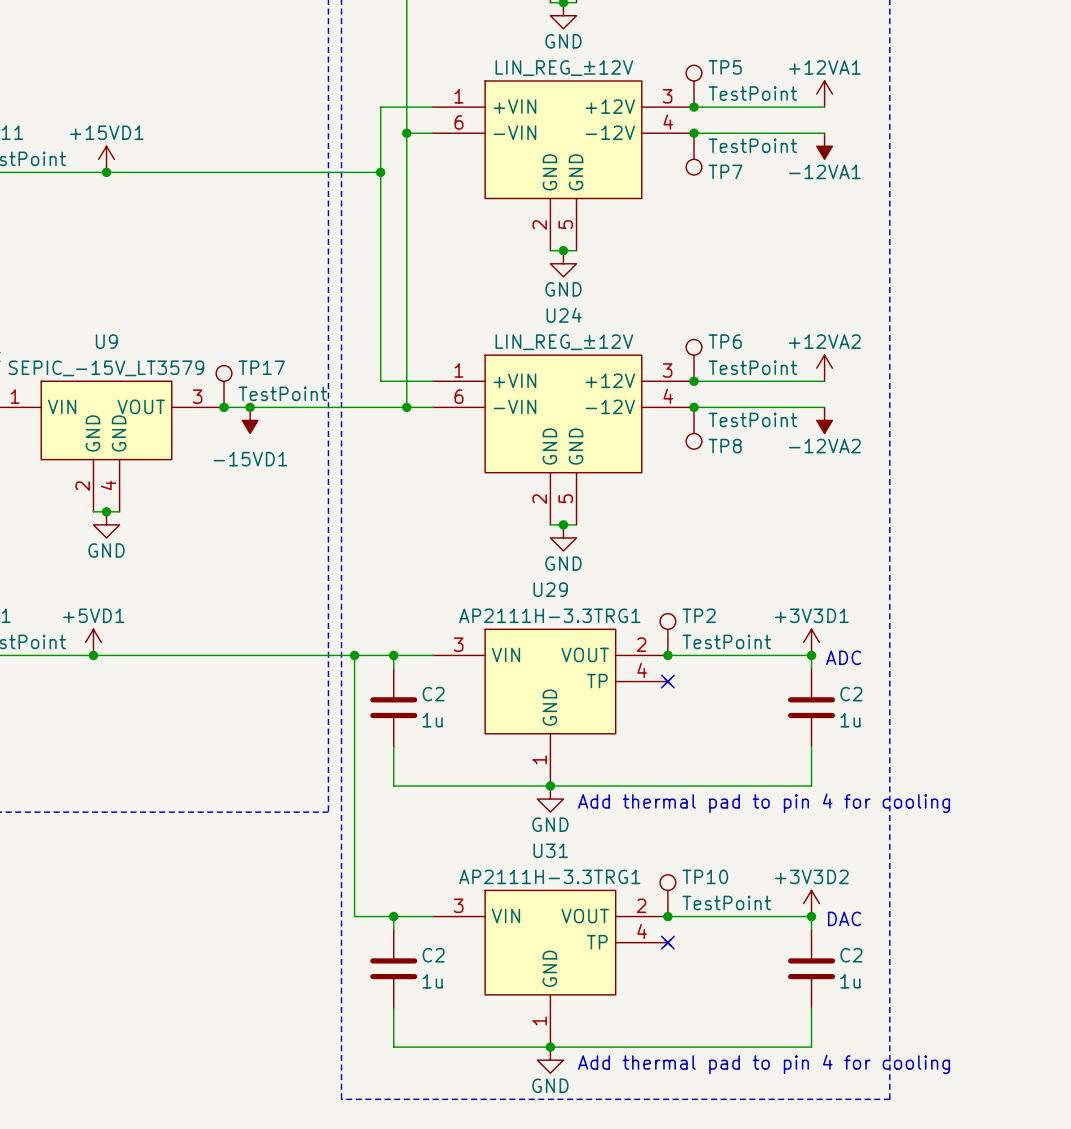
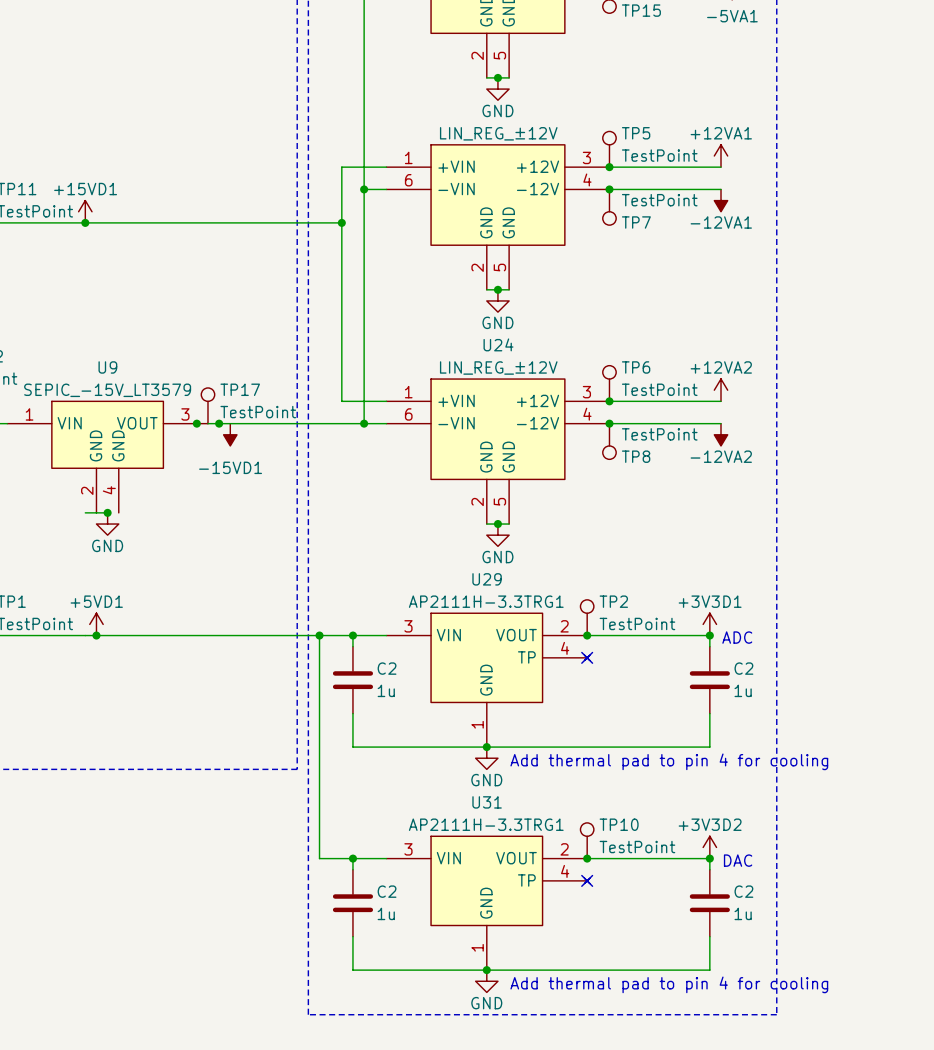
power symbol position: +15VD1 (106, 159) -> +15VD1 (85, 211)
junction position: (106, 172) -> (85, 222)
junction: none -> (196, 423)
junction: (224, 407) -> none
junction: none -> (219, 423)
junction: (250, 407) -> none
wire: (106, 511) (119, 511) -> (85, 512) (96, 512)

